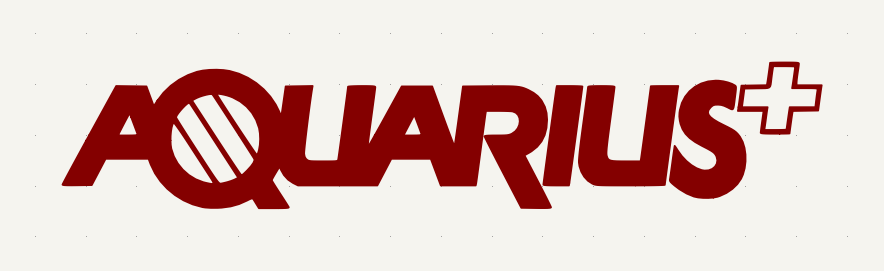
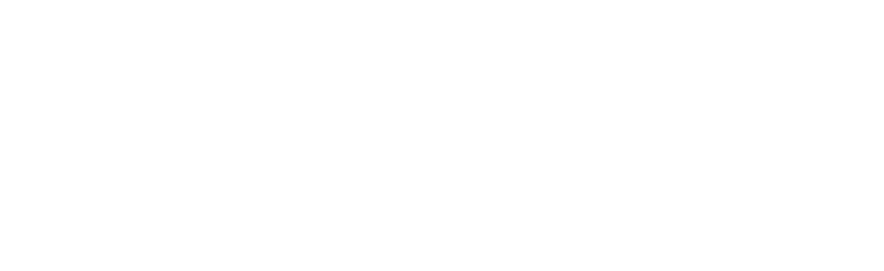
power symbol: (442, 135) -> none

